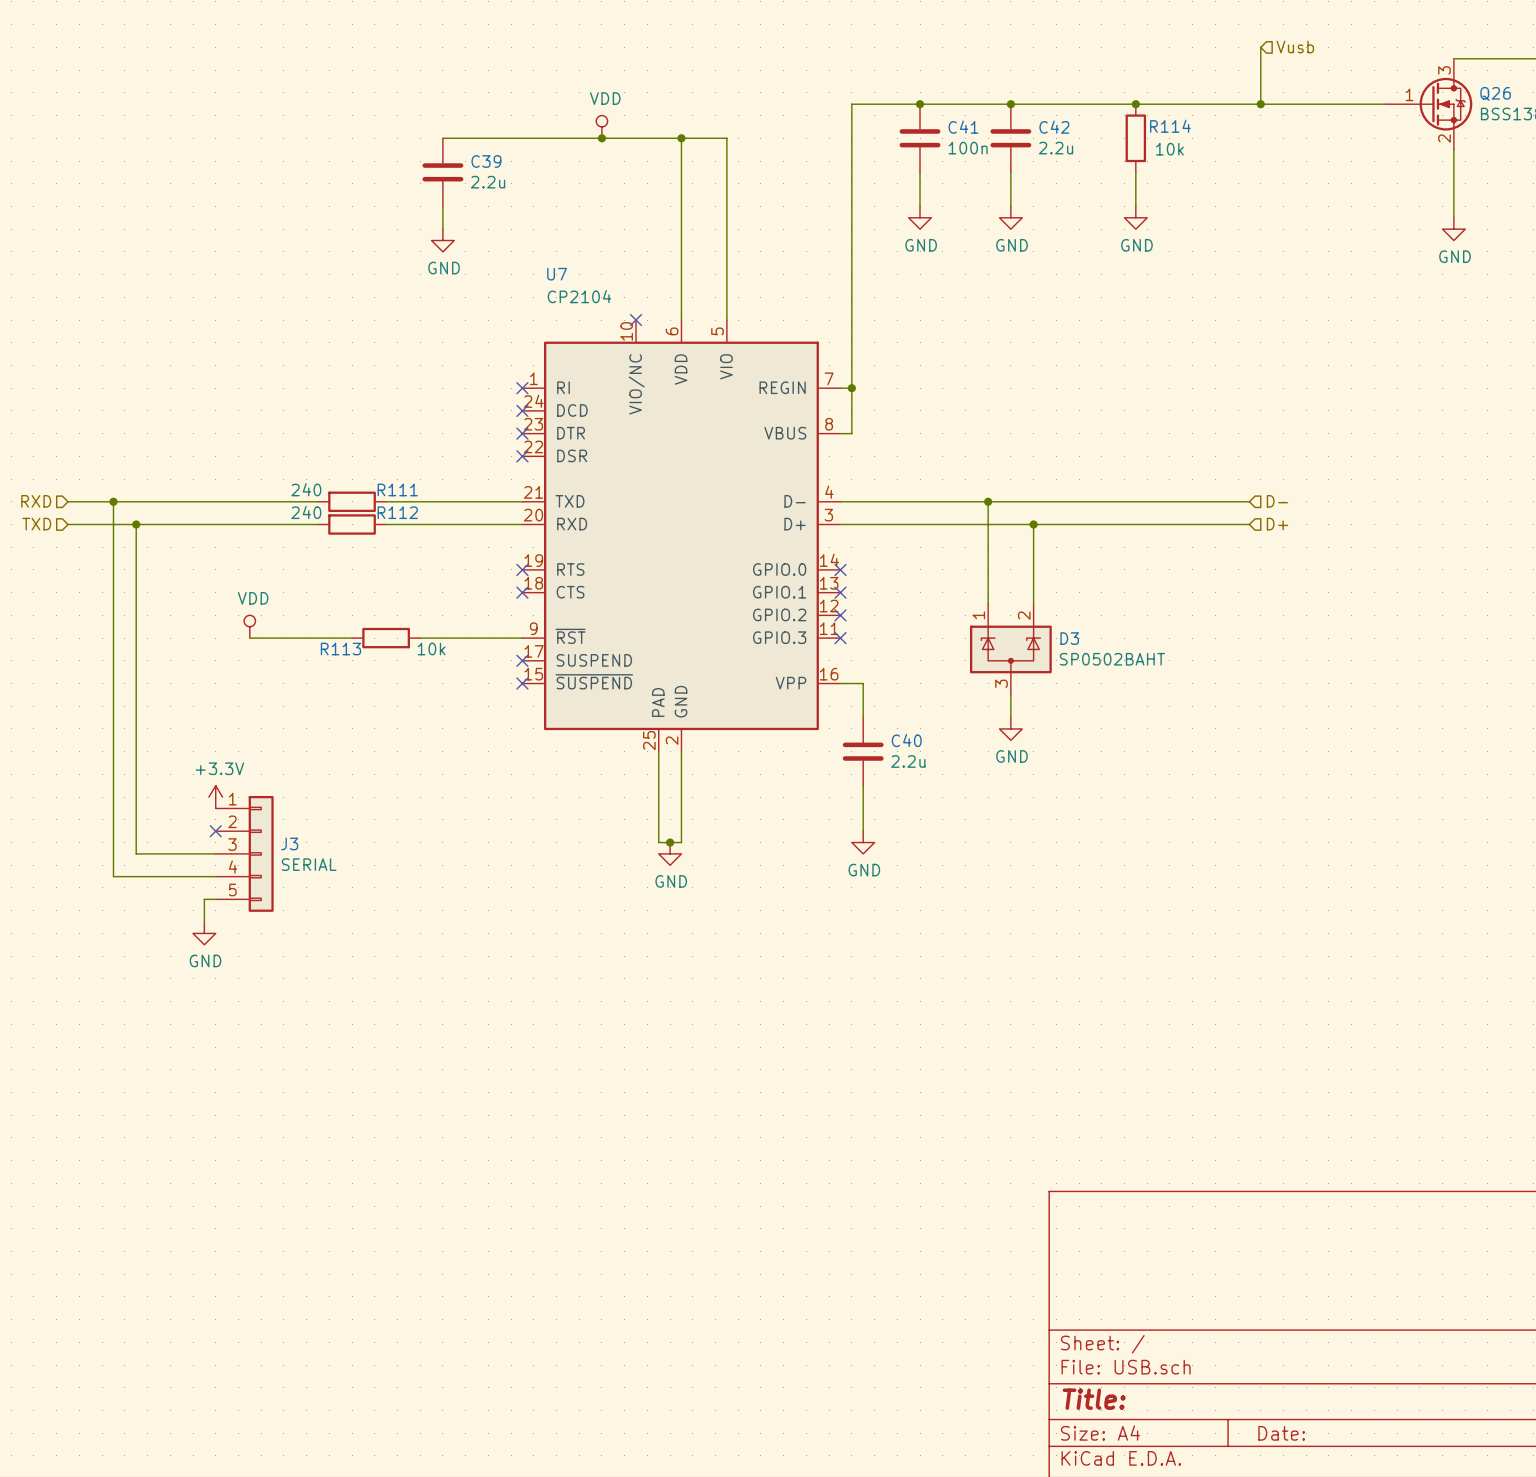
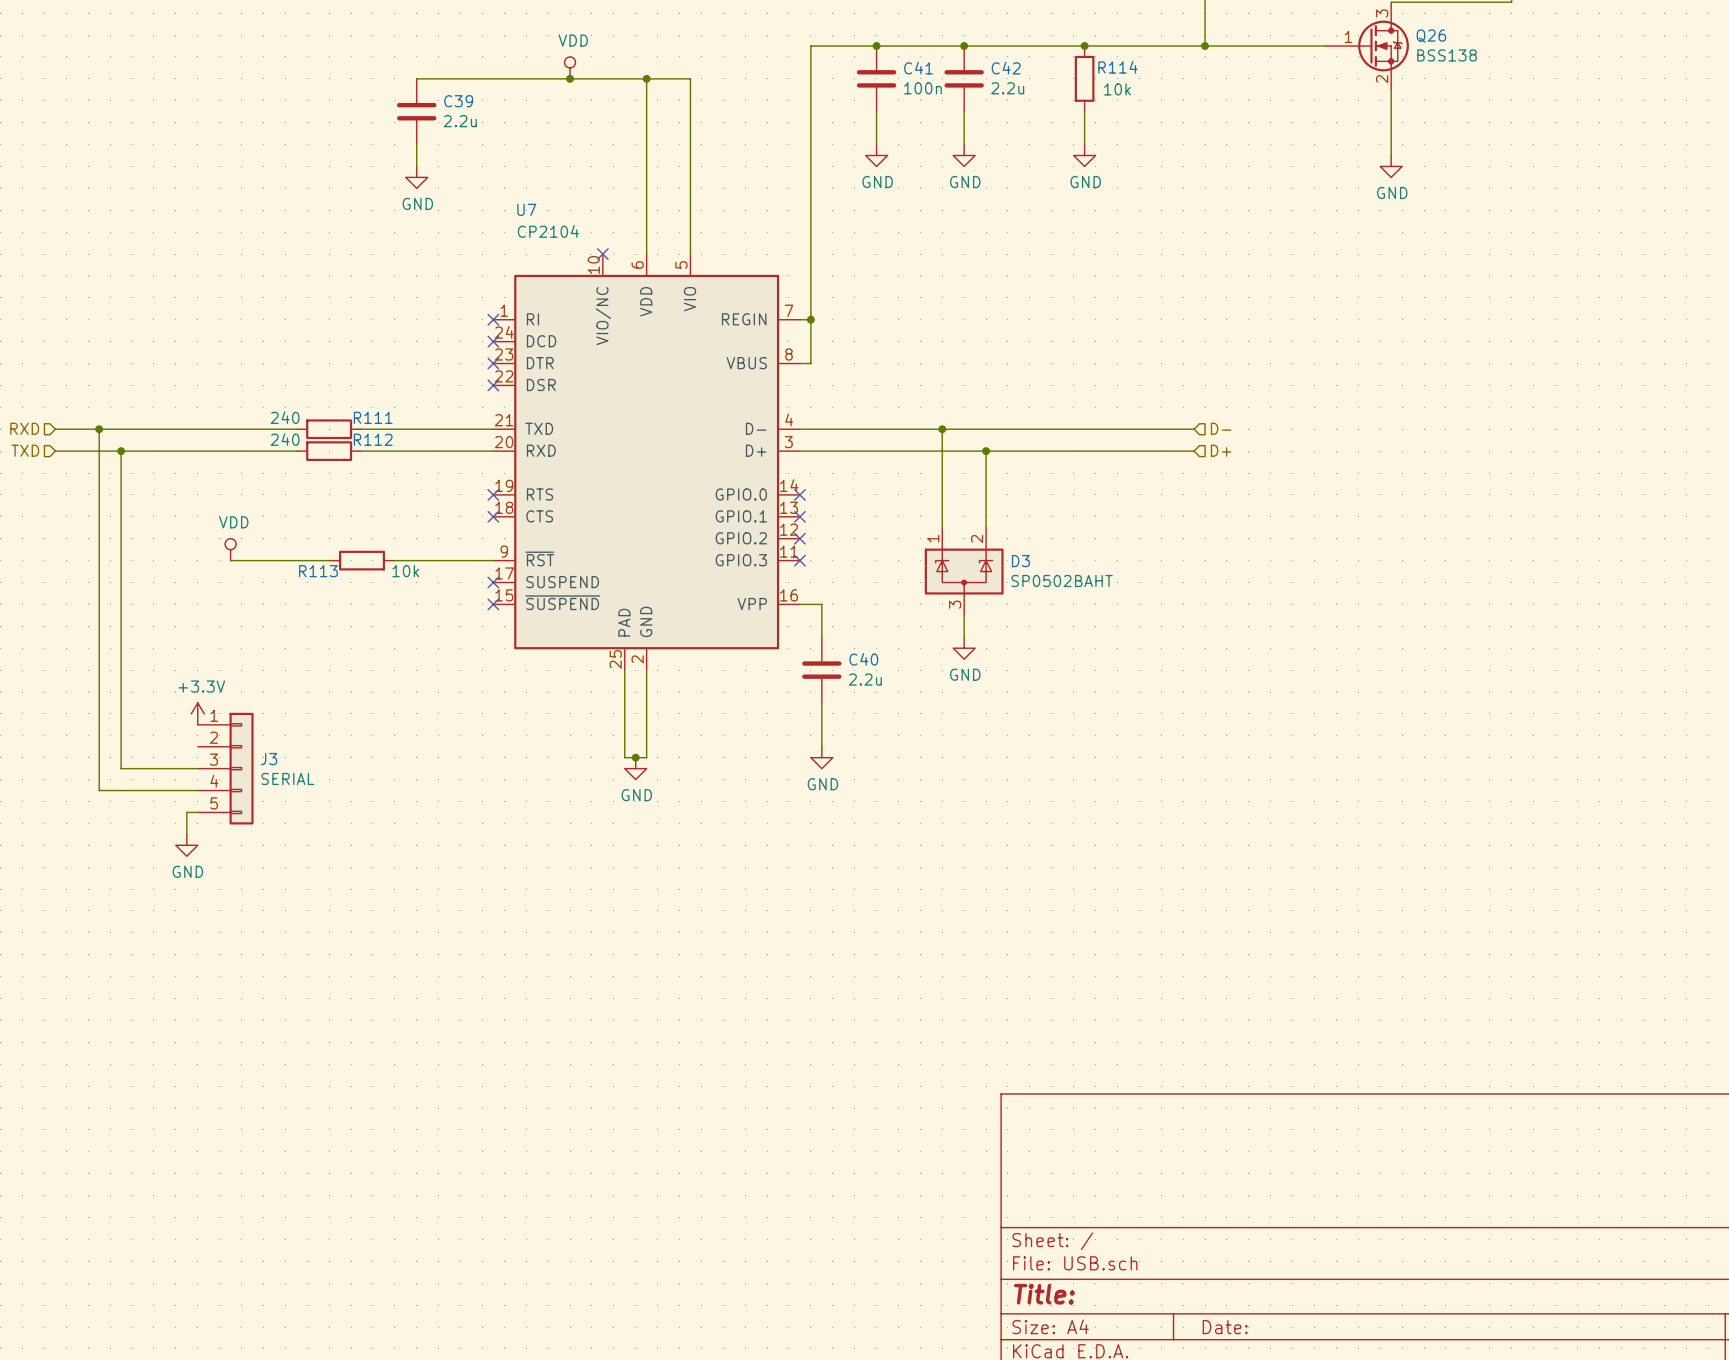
no-connect mark: (215, 831) -> none

